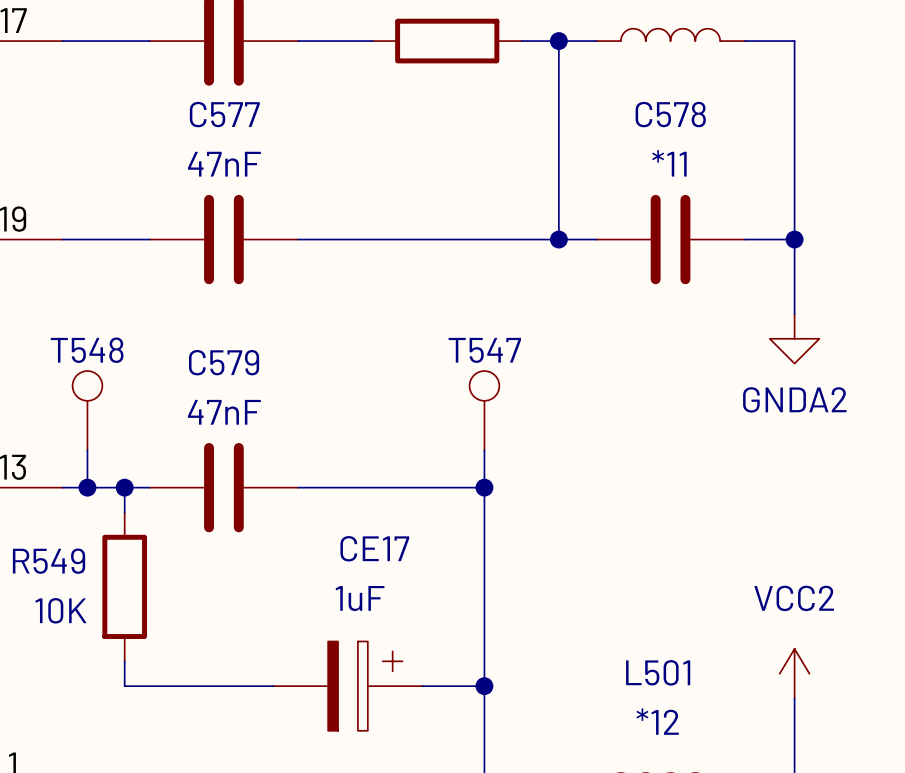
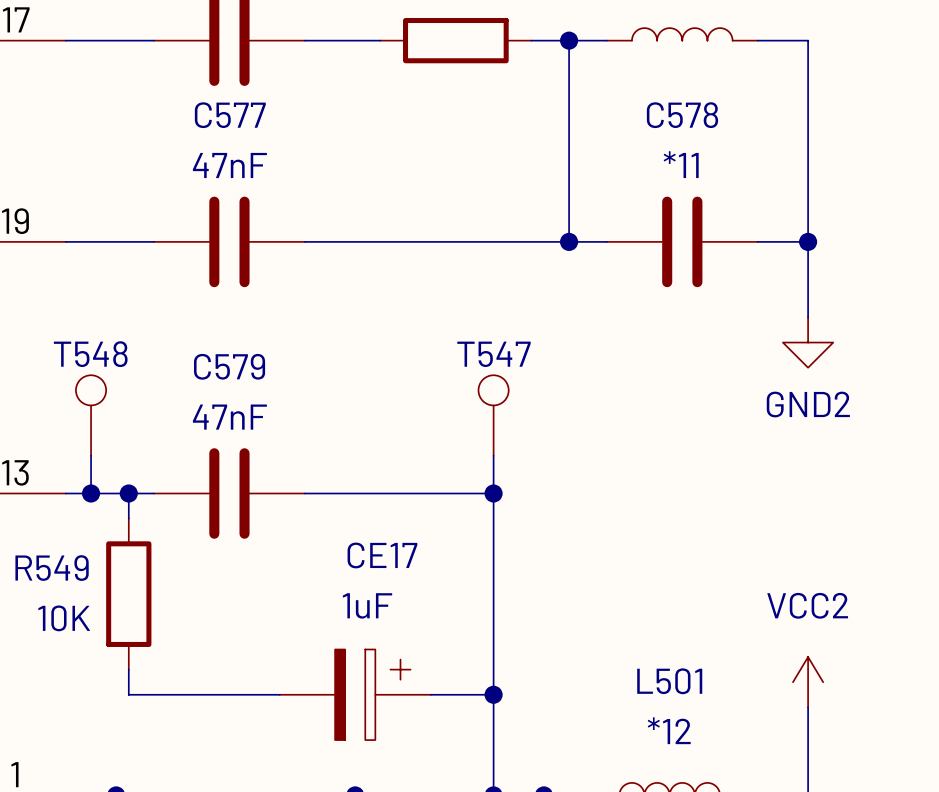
power symbol: GNDA2 (794, 338) -> GND2 (808, 342)

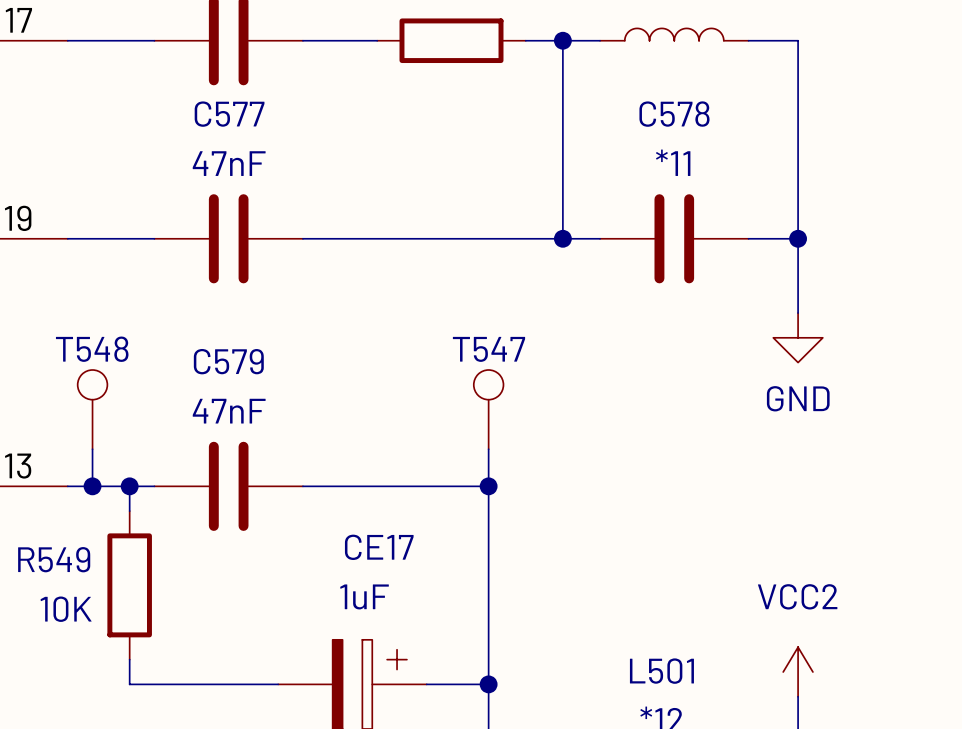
power symbol: GND2 (808, 342) -> GND (798, 337)

